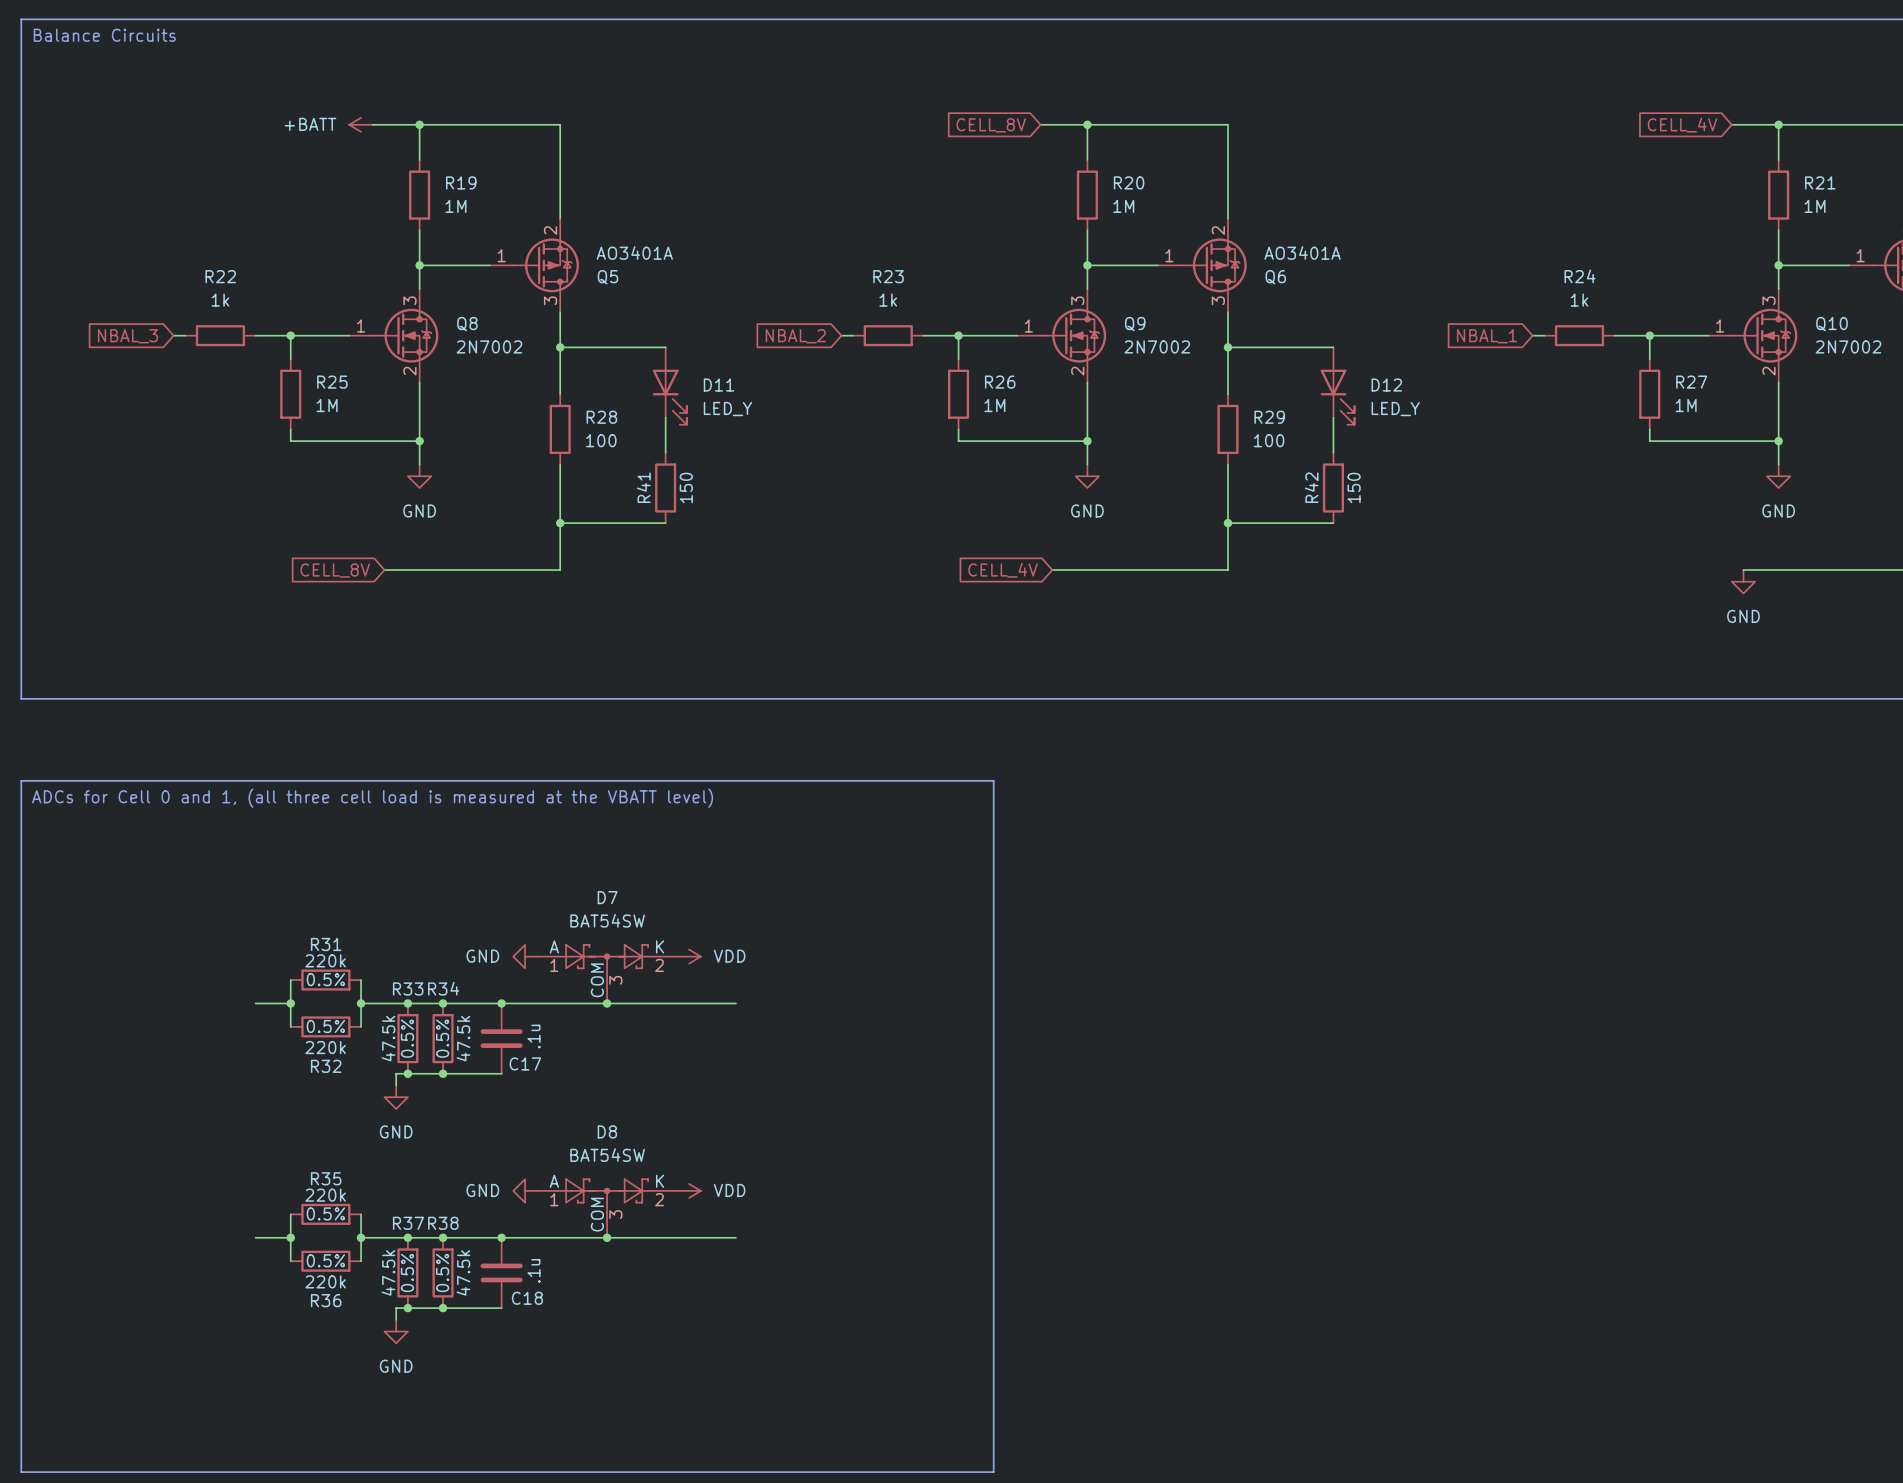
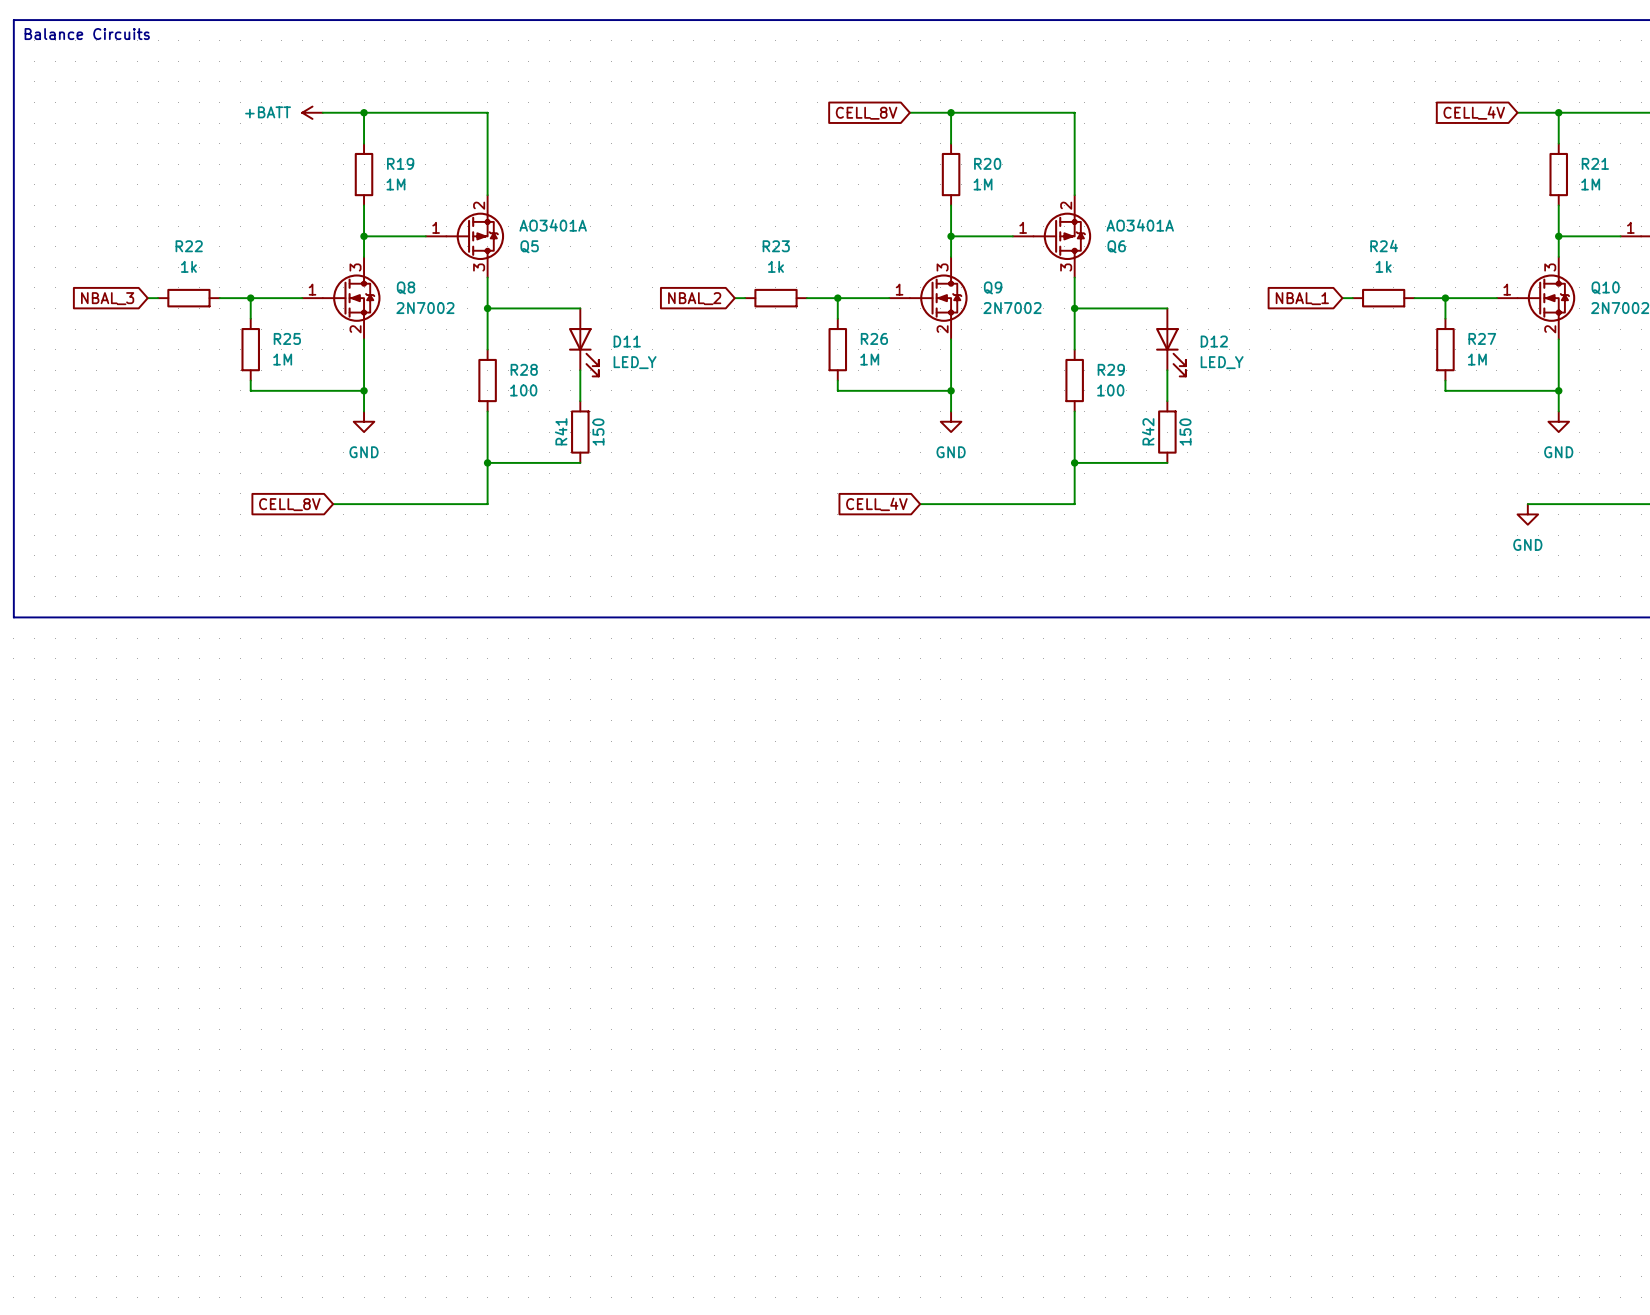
line: (21, 780) (993, 780) (993, 1472) (21, 1472) (21, 780) -> none
text: ADCs for Cell 0 and 1, (all three cell load is measured at the VBATT level) (372, 798) -> none
power symbol: GND (525, 956) -> none
power symbol: VDD (689, 956) -> none
D7: BAT54SW (607, 974) -> none
wire: (290, 980) (290, 1026) -> none
R31: 220k (325, 980) -> none
wire: (361, 980) (361, 1026) -> none
wire: (255, 1003) (290, 1003) -> none
junction: (290, 1003) -> none
wire: (361, 1003) (735, 1003) -> none
junction: (361, 1003) -> none
junction: (407, 1003) -> none
junction: (443, 1003) -> none
junction: (501, 1003) -> none
junction: (607, 1003) -> none
R32: 220k (325, 1026) -> none
R33: 47.5k (407, 1038) -> none
R34: 47.5k (443, 1038) -> none
C17: .1u (501, 1038) -> none
junction: (407, 1073) -> none
junction: (443, 1073) -> none
wire: (501, 1073) (396, 1073) (396, 1085) -> none
power symbol: GND (396, 1097) -> none
power symbol: GND (525, 1190) -> none
power symbol: VDD (689, 1190) -> none
D8: BAT54SW (607, 1208) -> none
wire: (290, 1214) (290, 1261) -> none
R35: 220k (325, 1214) -> none
wire: (361, 1214) (361, 1261) -> none
wire: (255, 1237) (290, 1237) -> none
junction: (290, 1237) -> none
wire: (361, 1237) (735, 1237) -> none
junction: (361, 1237) -> none
junction: (407, 1237) -> none
junction: (443, 1237) -> none
junction: (501, 1237) -> none
junction: (607, 1237) -> none
R36: 220k (325, 1261) -> none
R37: 47.5k (407, 1272) -> none
R38: 47.5k (443, 1272) -> none
C18: .1u (501, 1272) -> none
junction: (407, 1308) -> none
junction: (443, 1308) -> none
wire: (501, 1308) (396, 1308) (396, 1319) -> none
power symbol: GND (396, 1331) -> none

